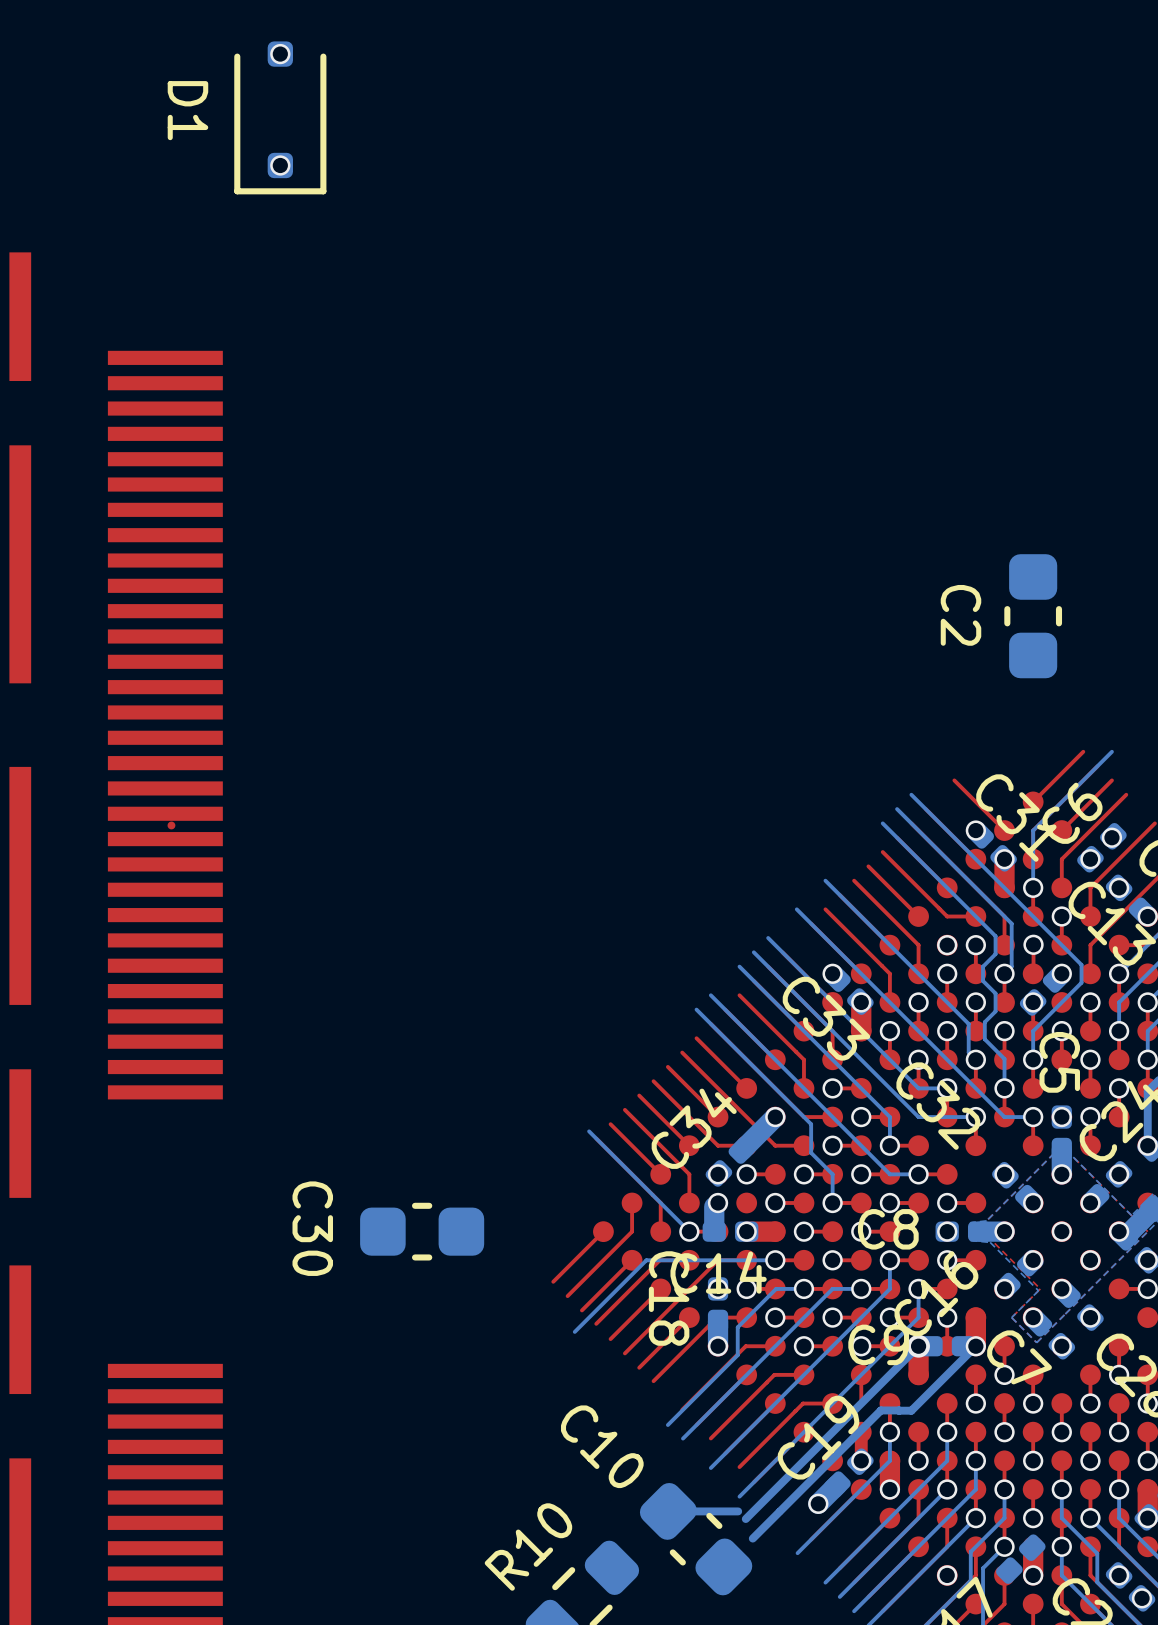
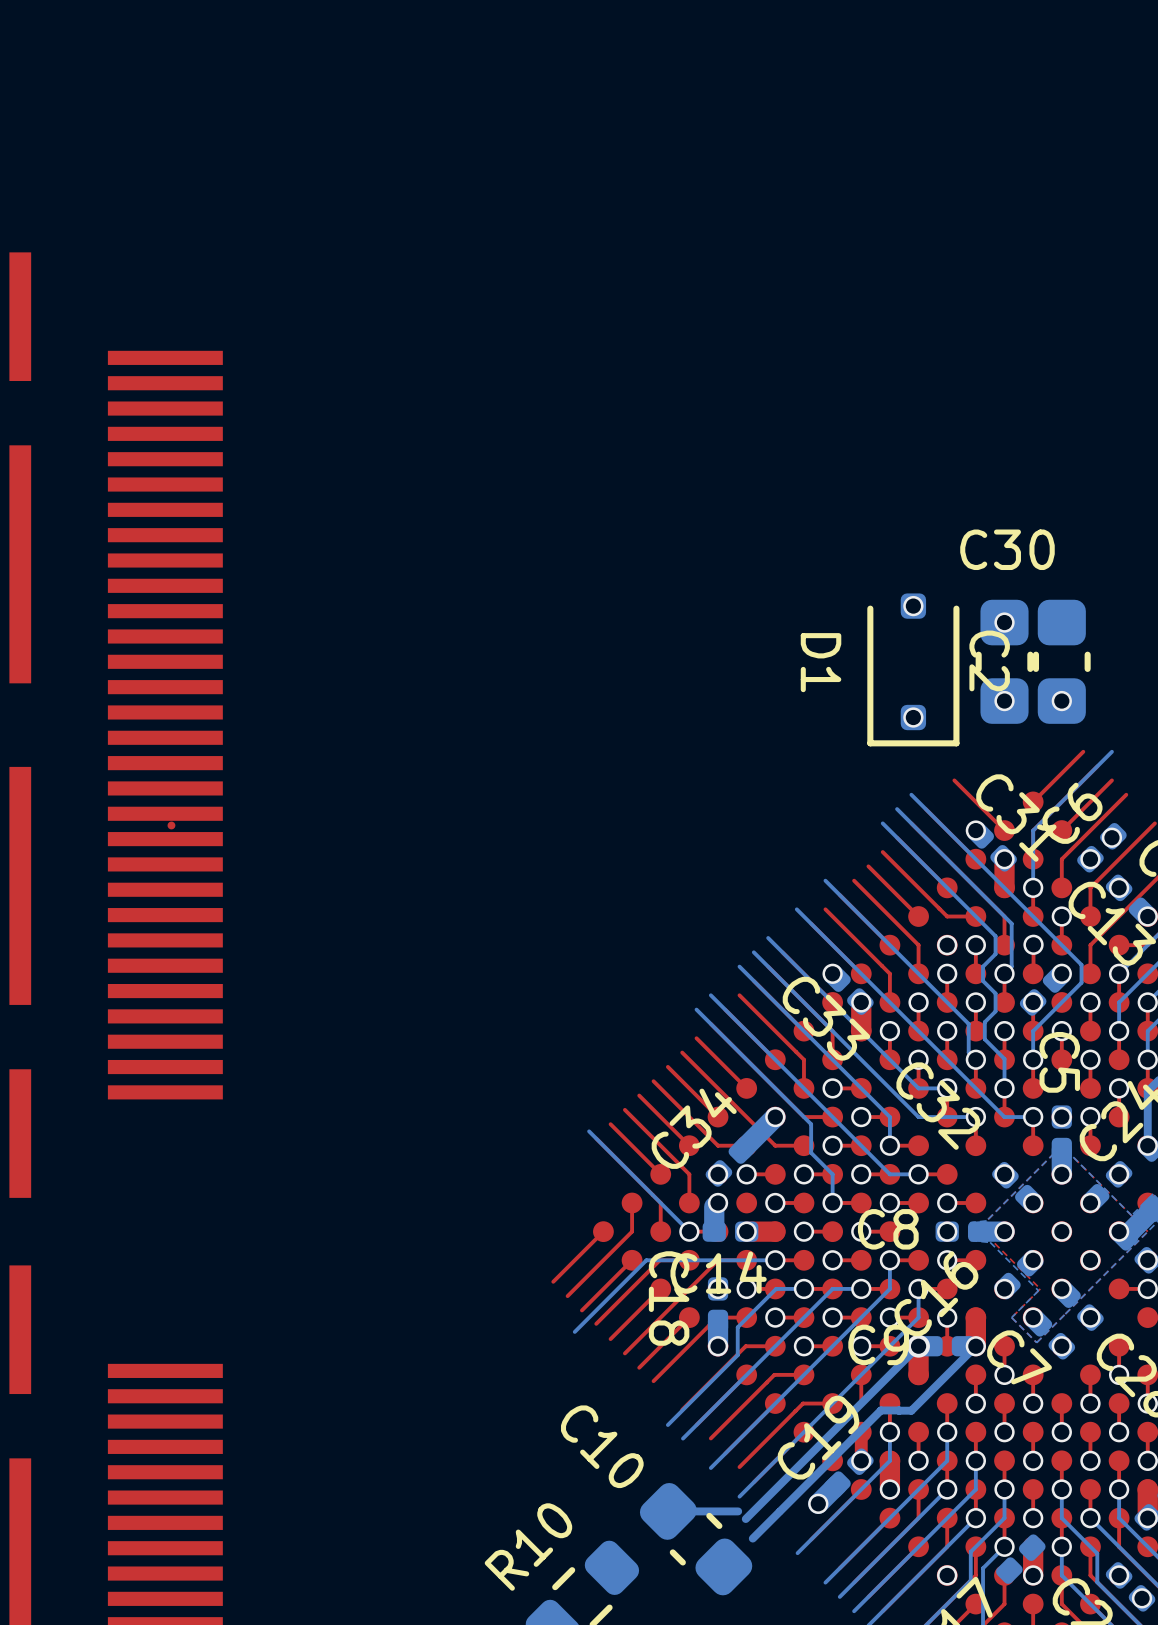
via: (280, 54) -> none
D1 position: (280, 117) -> (913, 669)
via: (280, 165) -> none
via: none -> (913, 606)
C2 position: (1033, 616) -> (1061, 661)
via: none -> (1004, 622)
via: none -> (1004, 701)
via: none -> (1061, 701)
via: none -> (913, 717)
C30 rotation: 0° (422, 1231) -> 90° clockwise (1004, 661)
C30 position: (422, 1231) -> (1004, 661)

